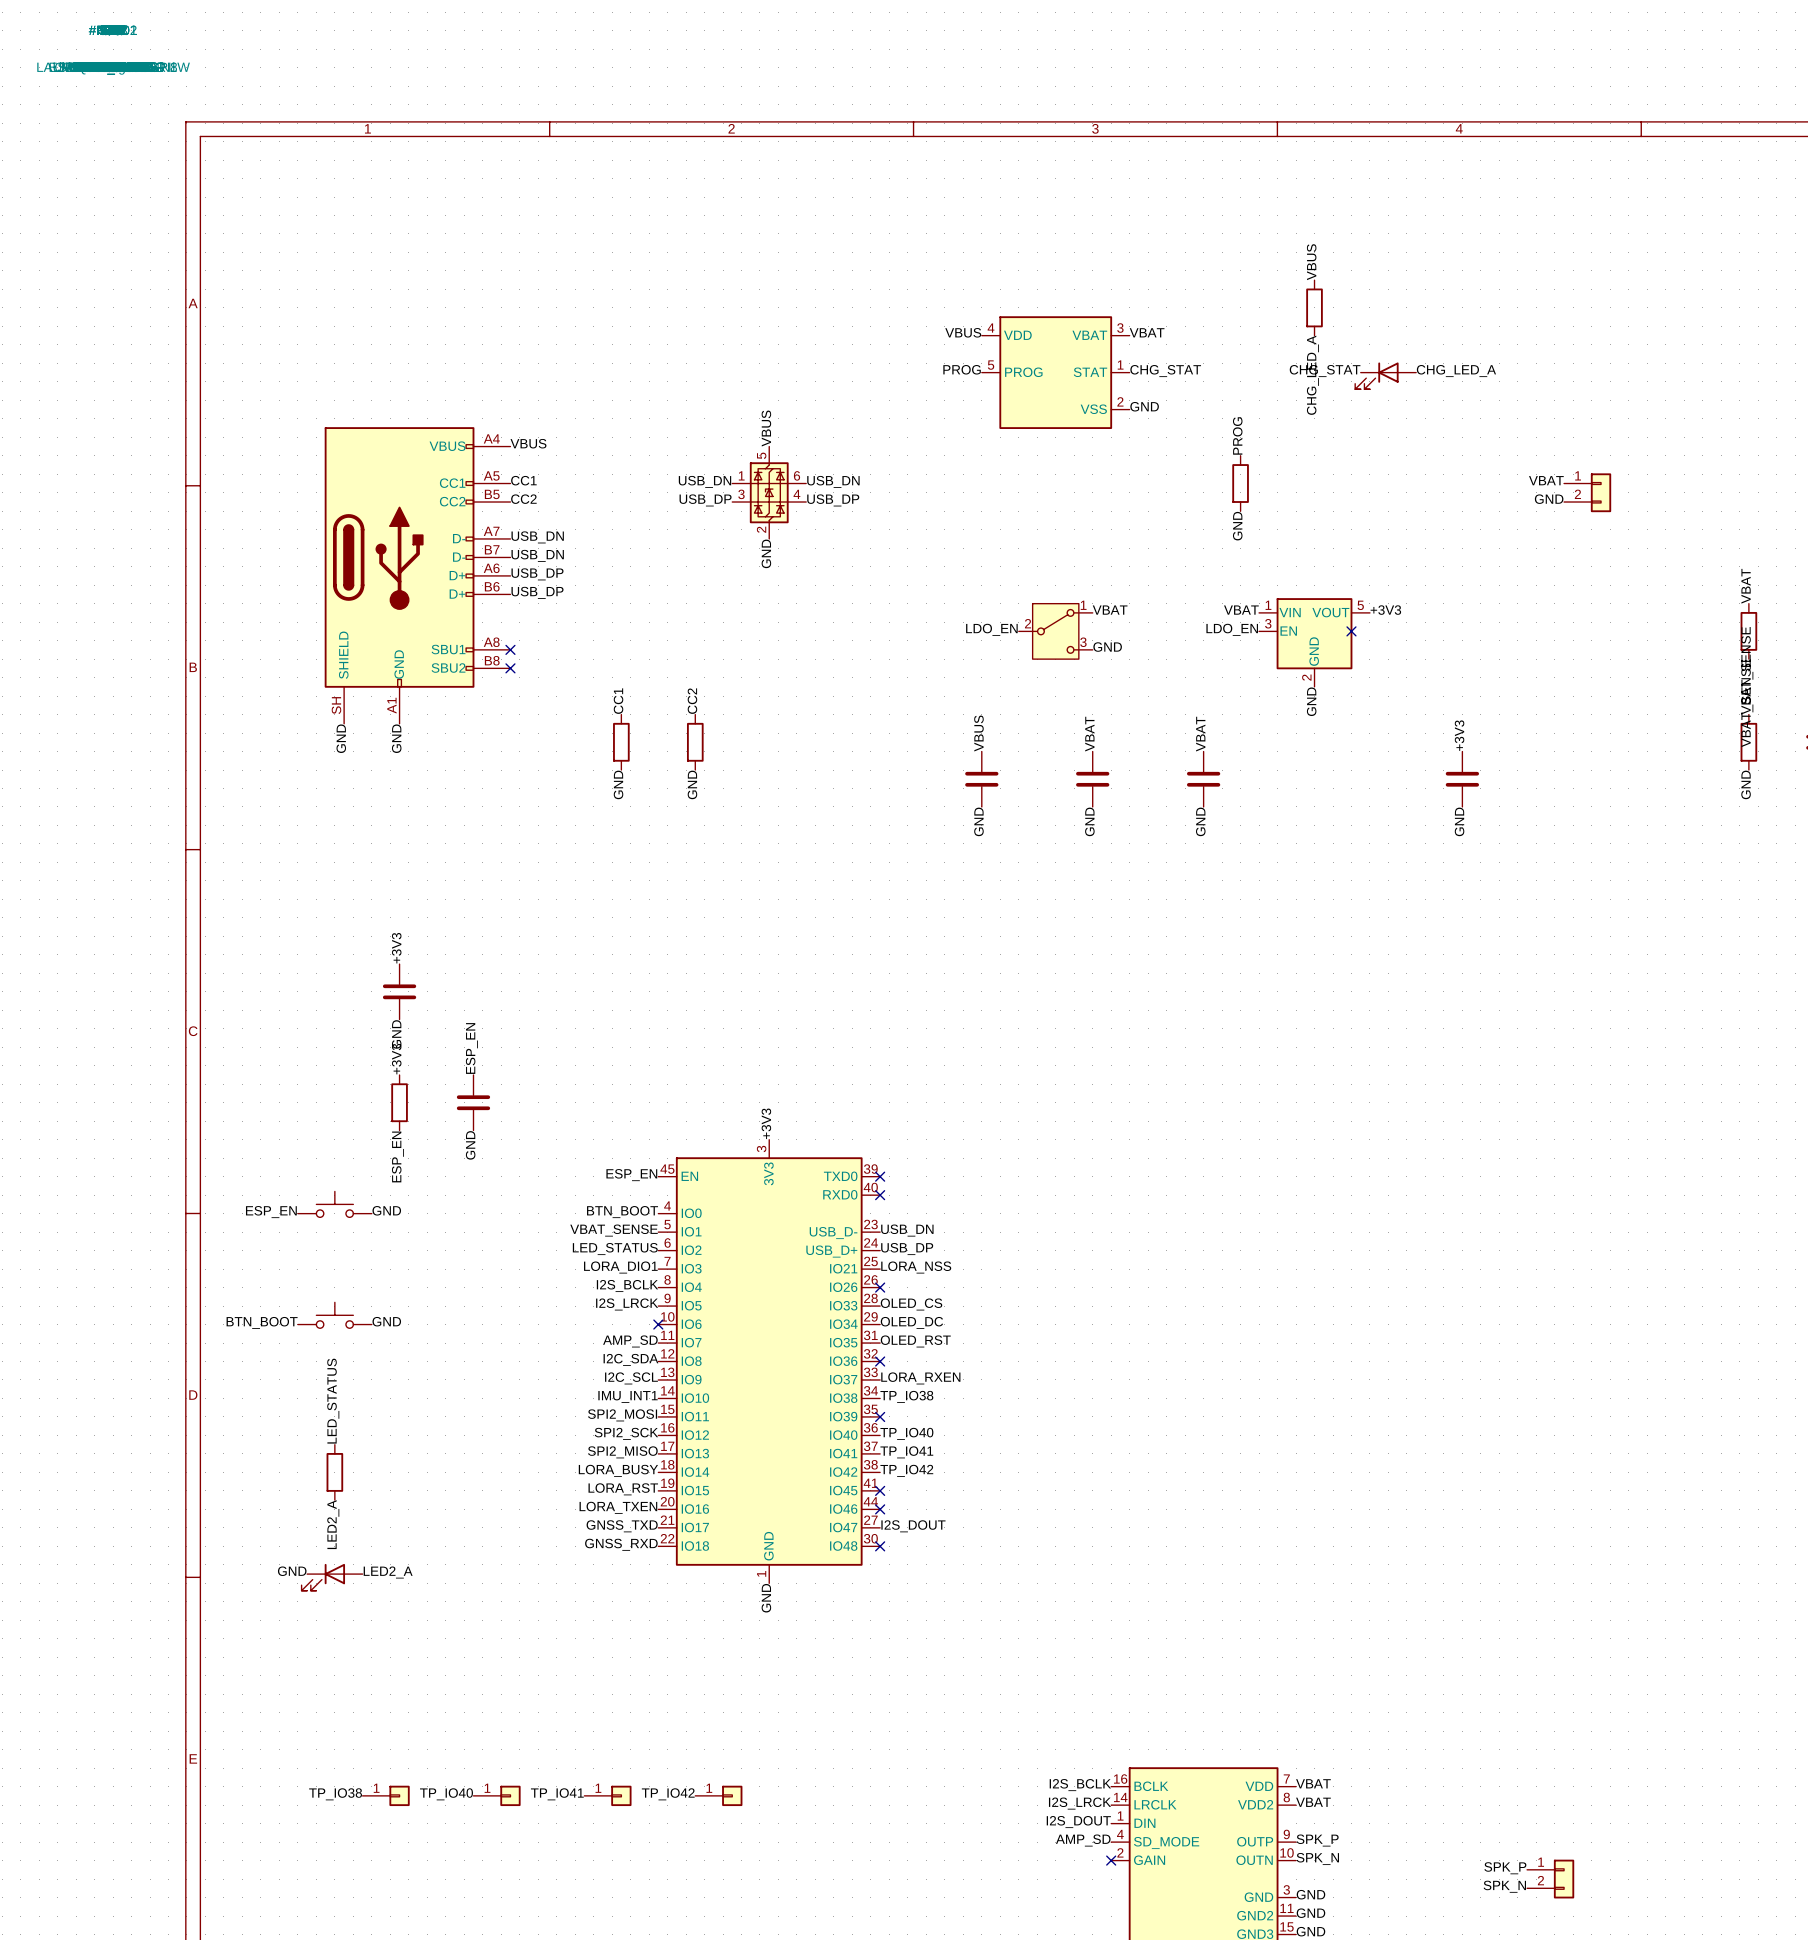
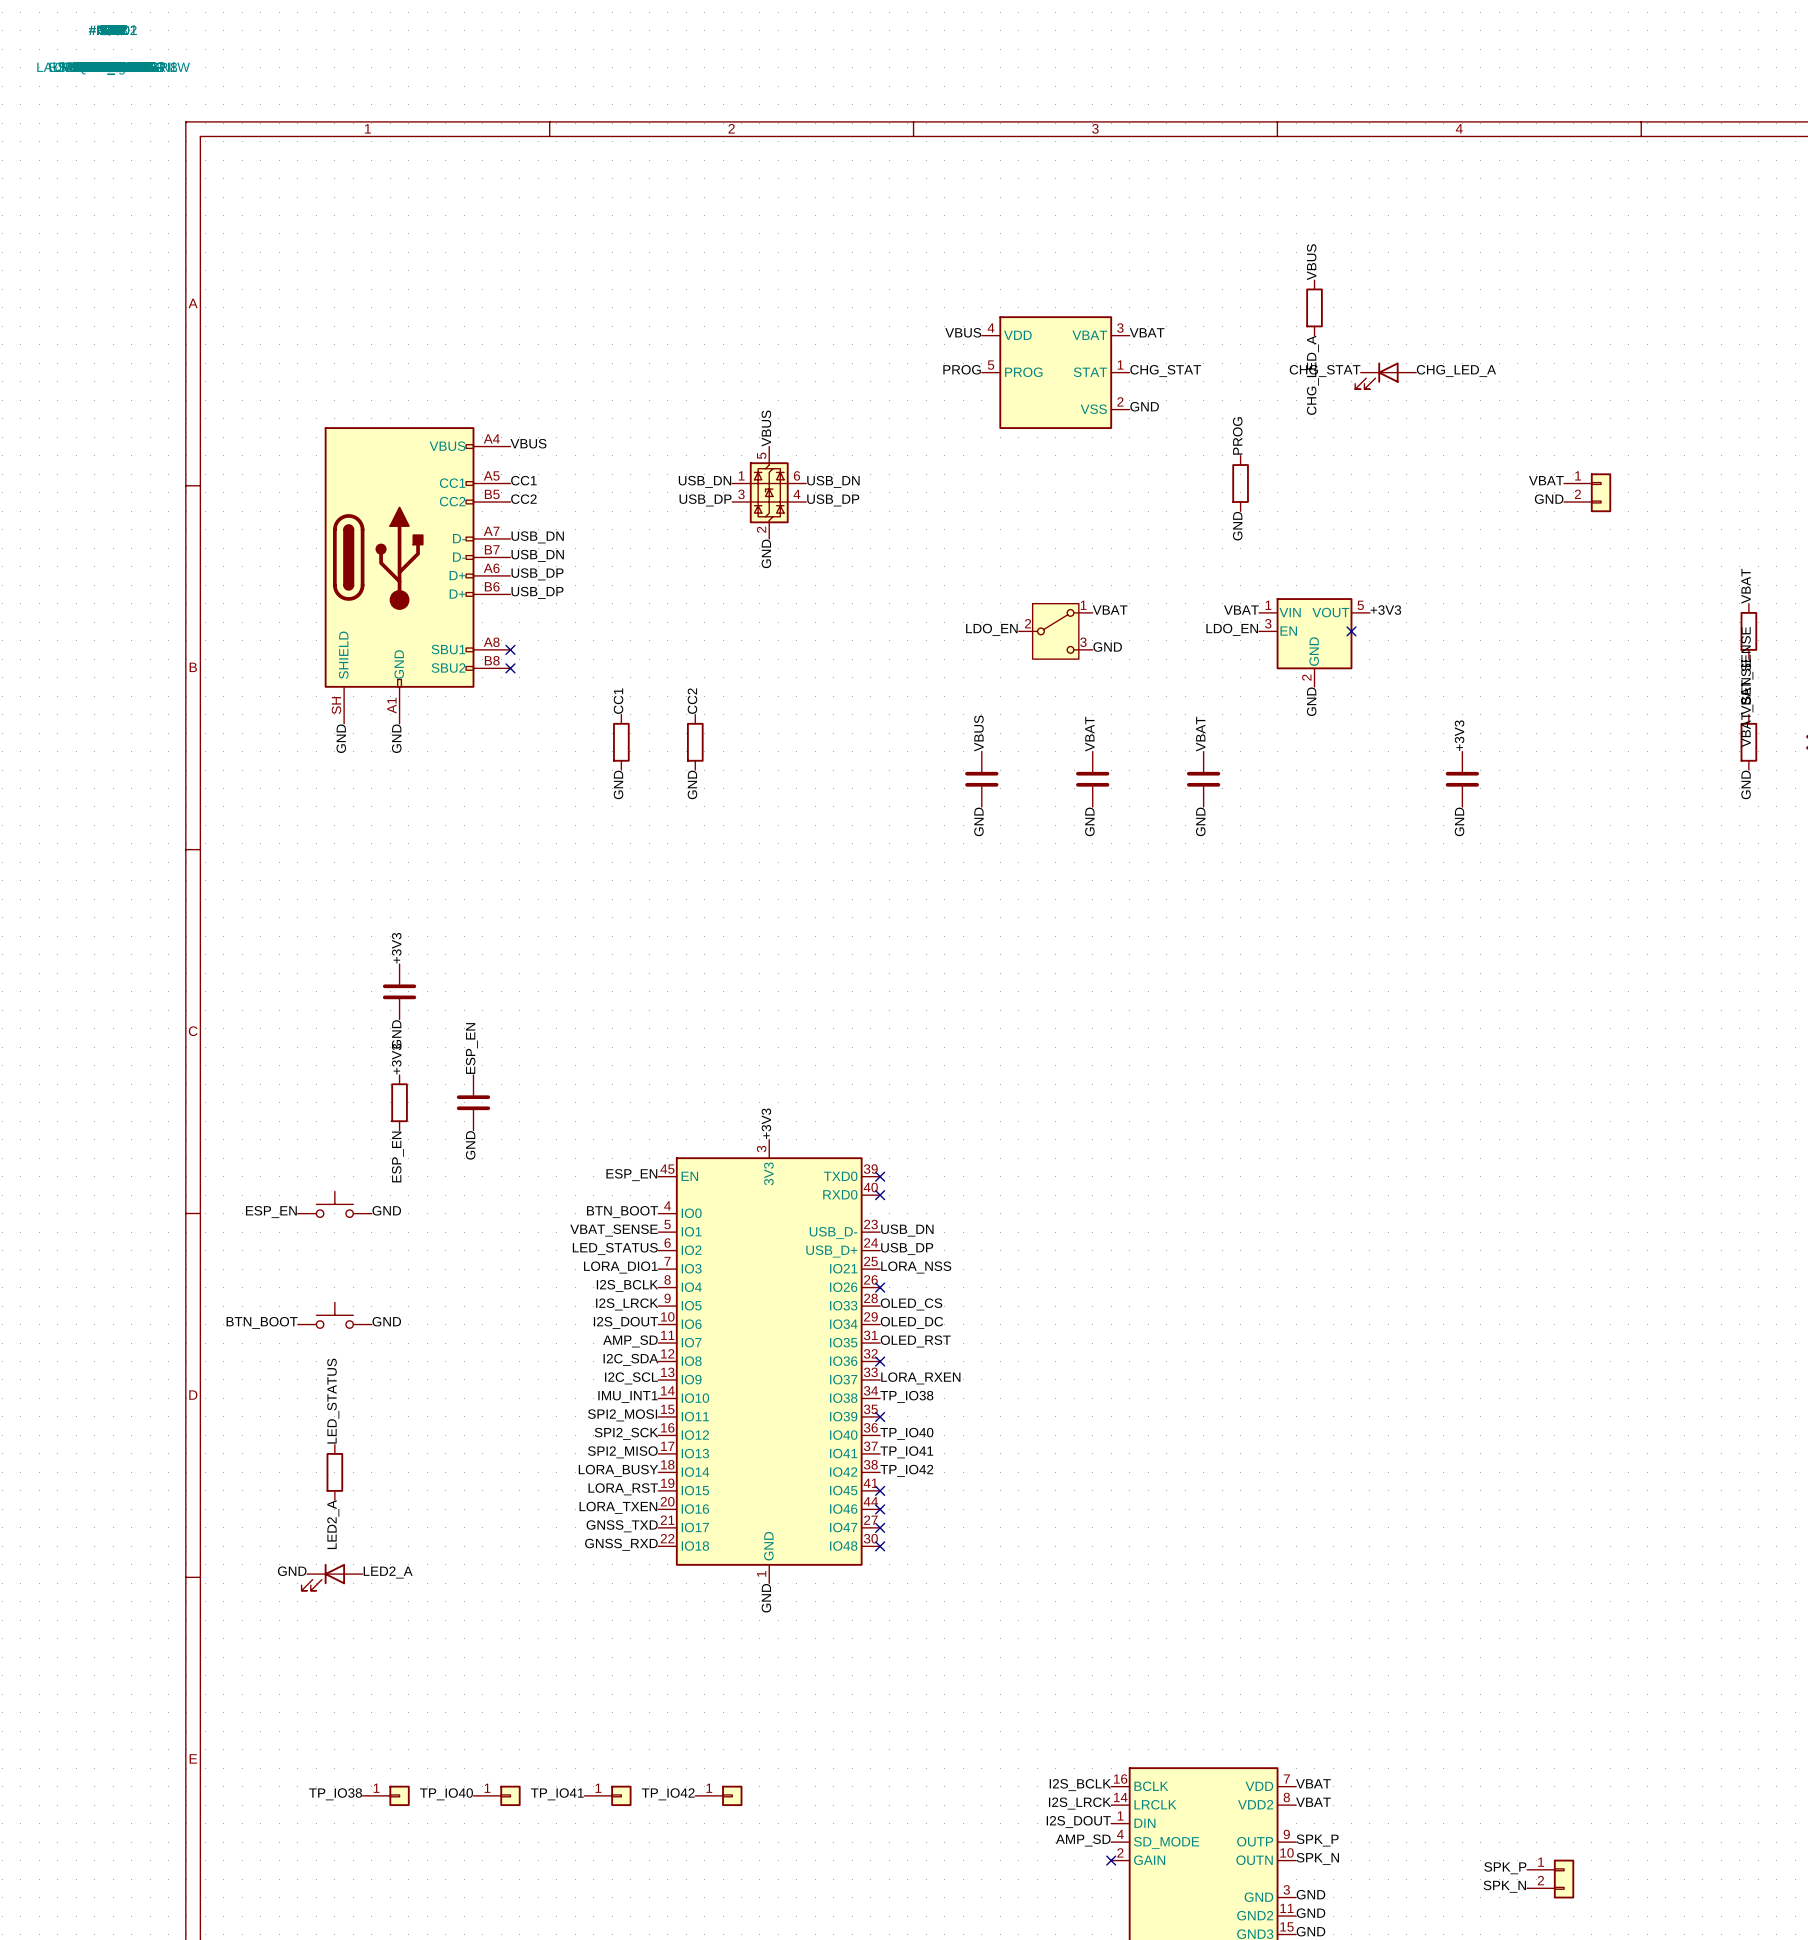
label: none -> I2S_DOUT (625, 1322)
no-connect mark: (658, 1324) -> none
label: I2S_DOUT (913, 1526) -> none
no-connect mark: none -> (880, 1527)

